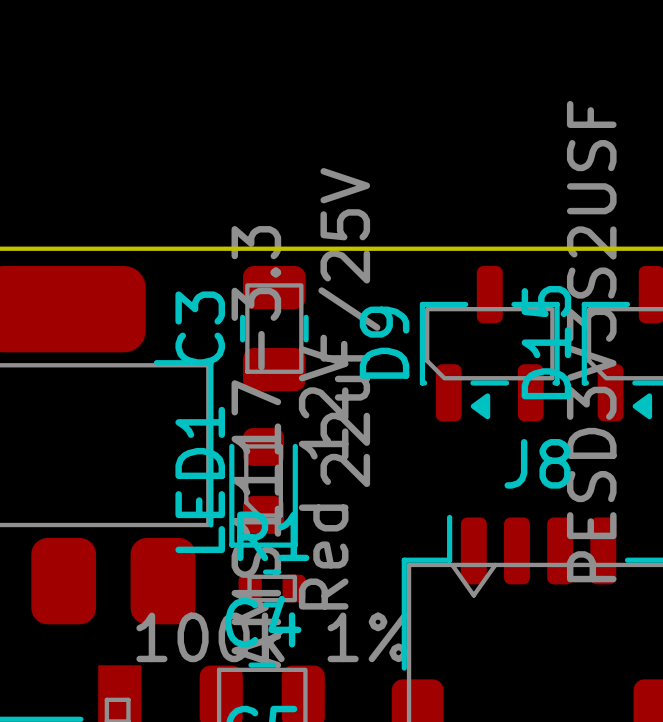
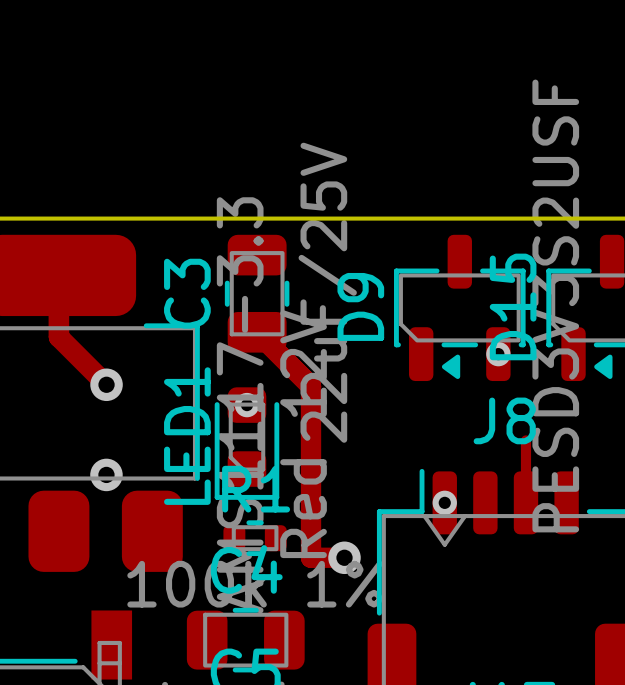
top track: none -> (58, 275) (58, 337) (106, 384)
top track: none -> (257, 332) (311, 386) (311, 557) (344, 557)
via: none -> (498, 354)
via: none -> (106, 384)
via: none -> (246, 405)
top track: none -> (525, 440) (525, 502)
via: none -> (106, 474)
via: none -> (444, 502)
via: none -> (344, 557)

